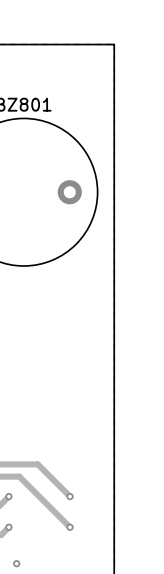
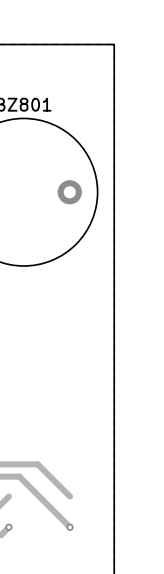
via: (8, 496) -> none
via: (70, 496) -> none
via: (16, 563) -> none

